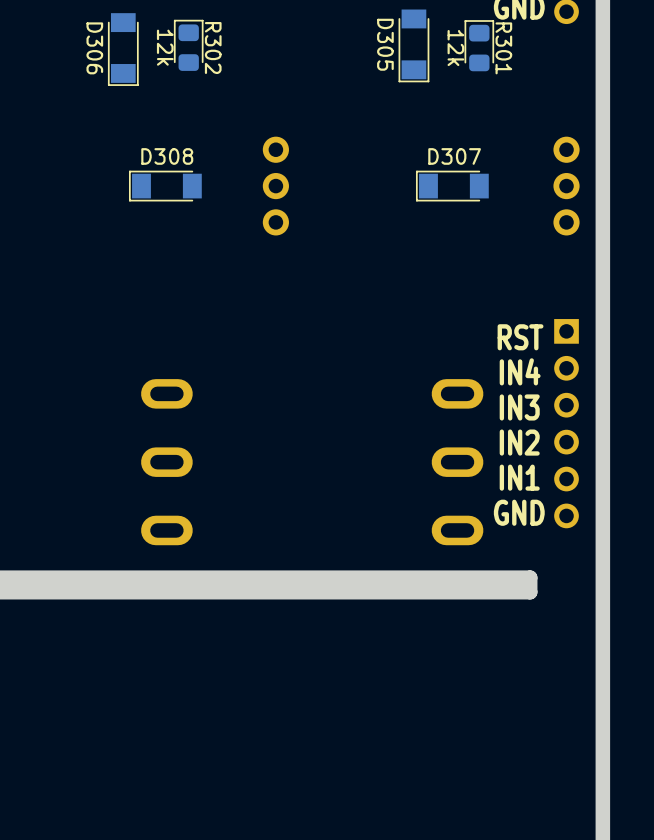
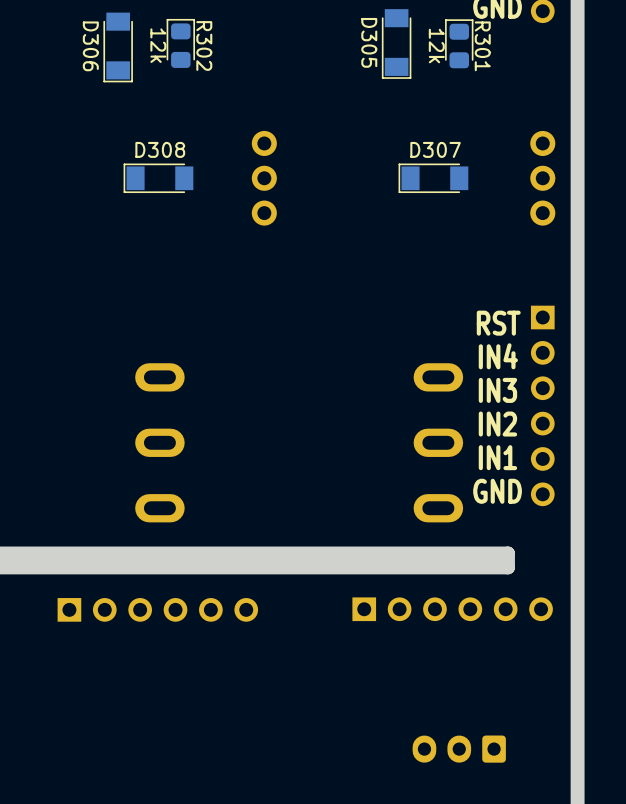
part: none -> (452, 609)
part: none -> (157, 609)
part: none -> (459, 749)

